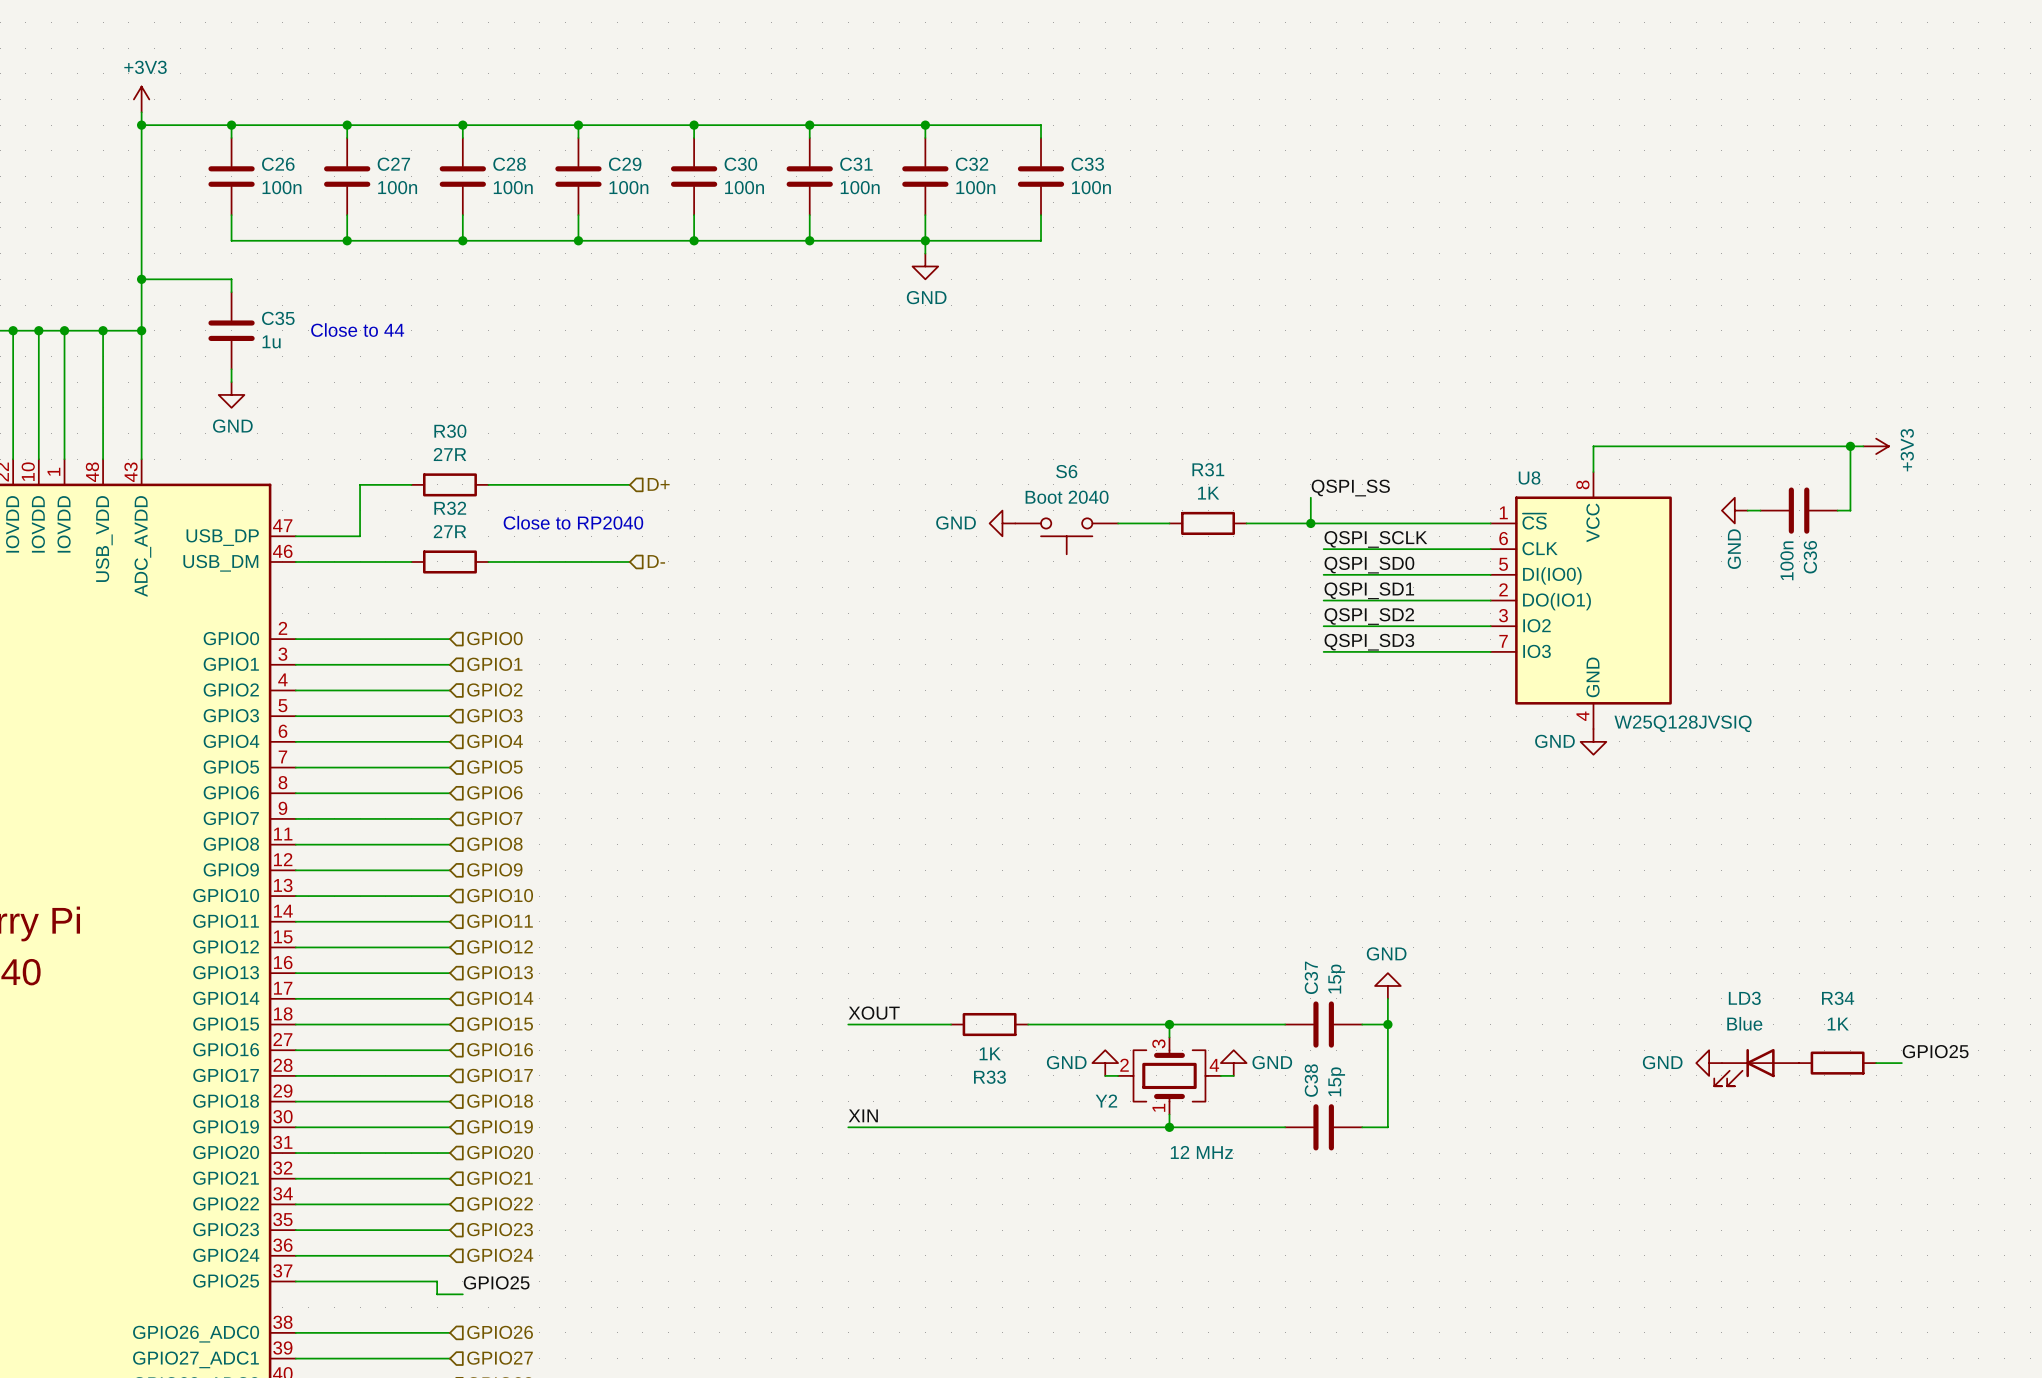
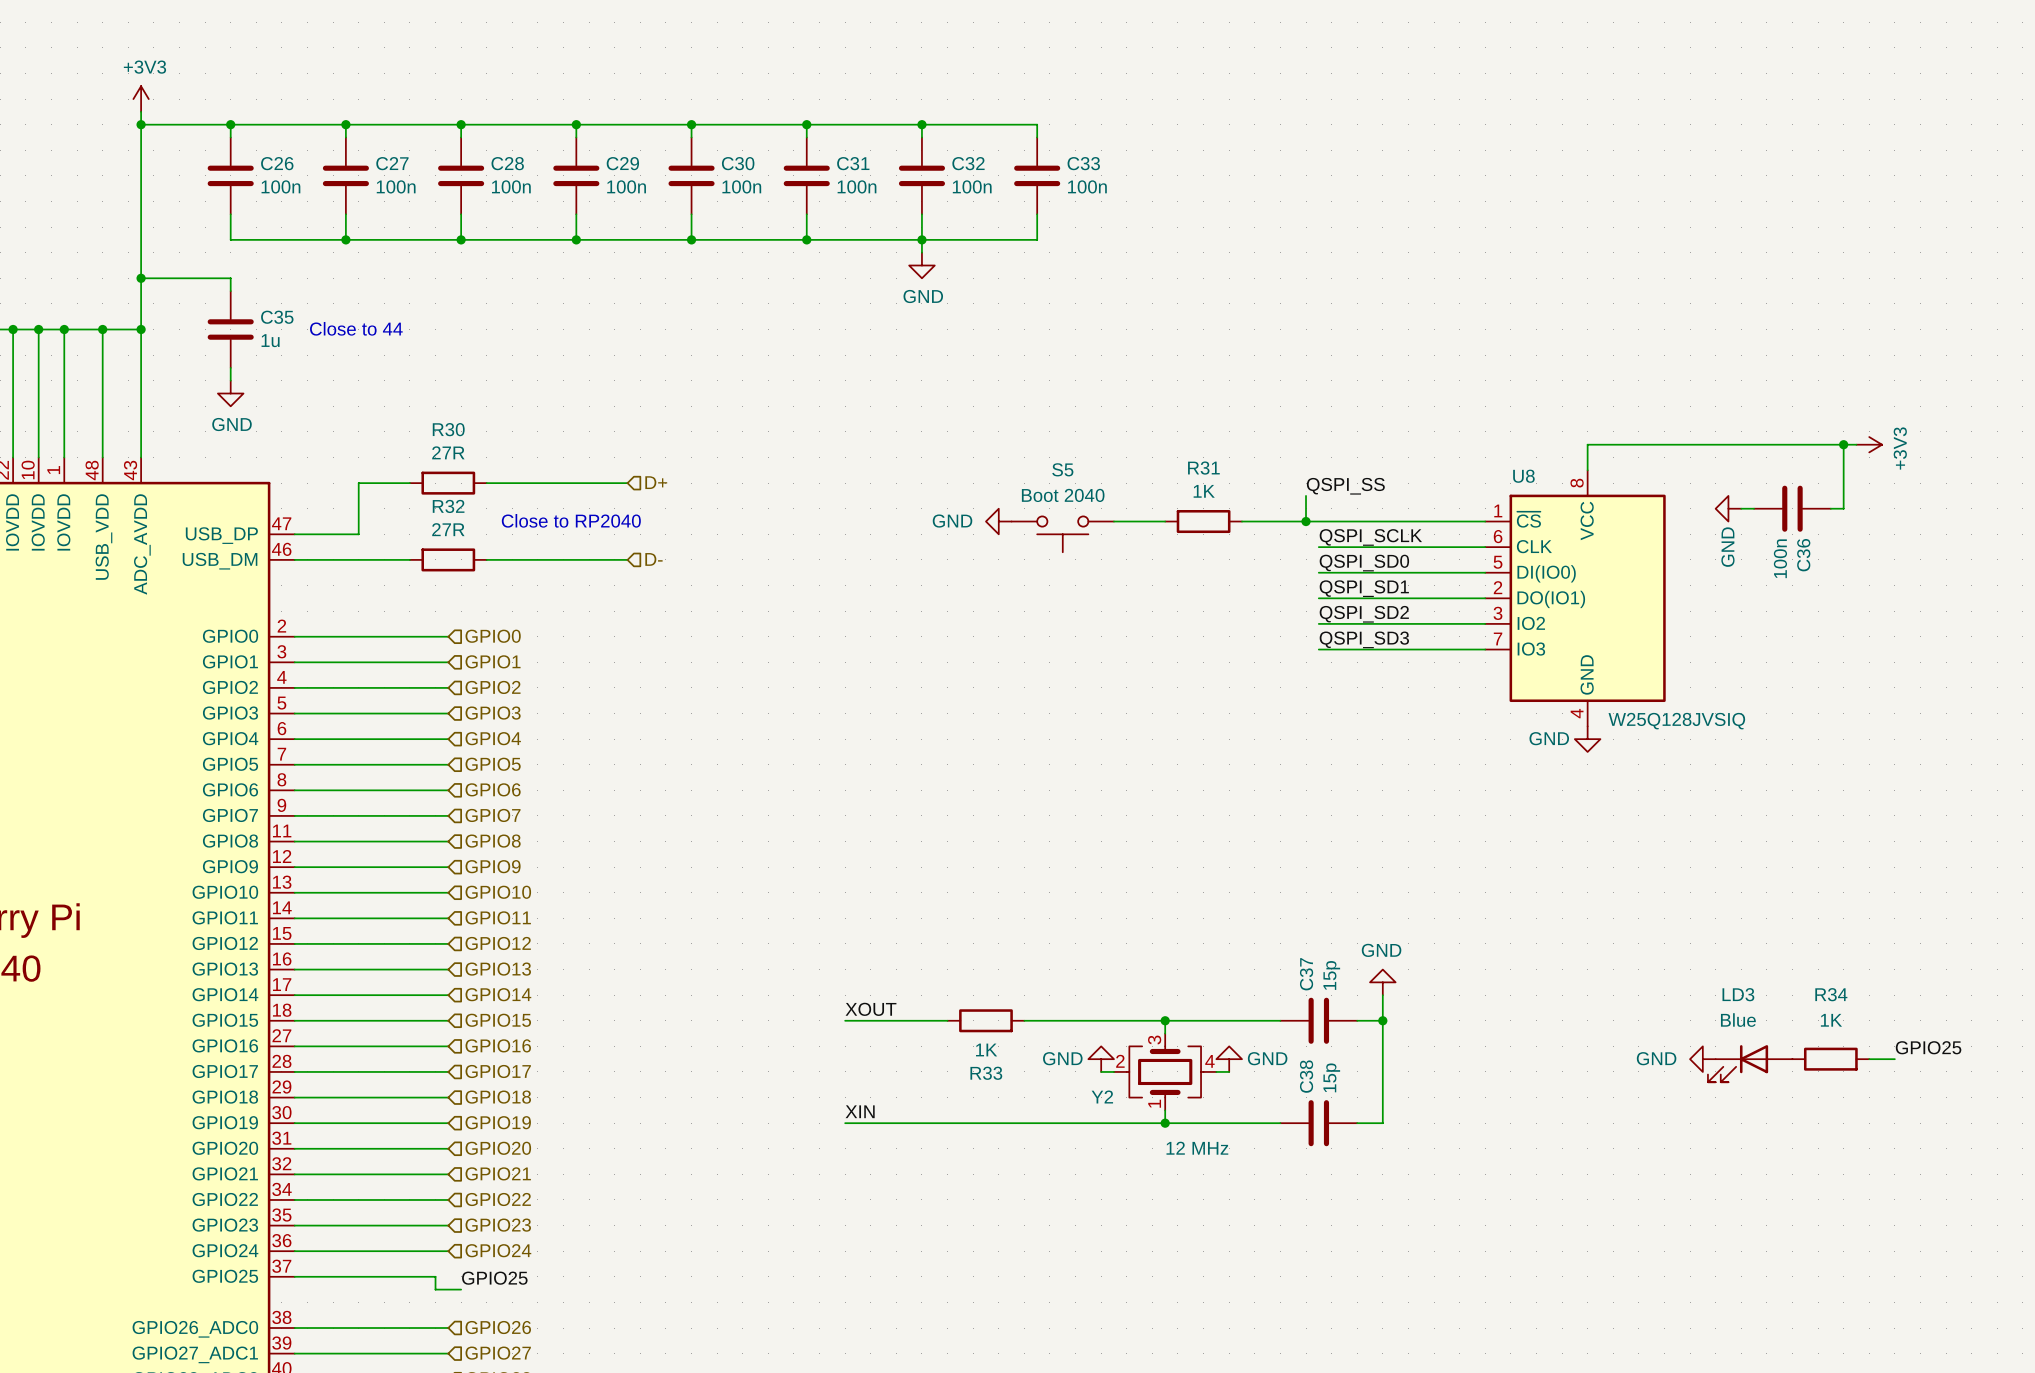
S6 name: S6 (1066, 471) -> S5 (1062, 469)

